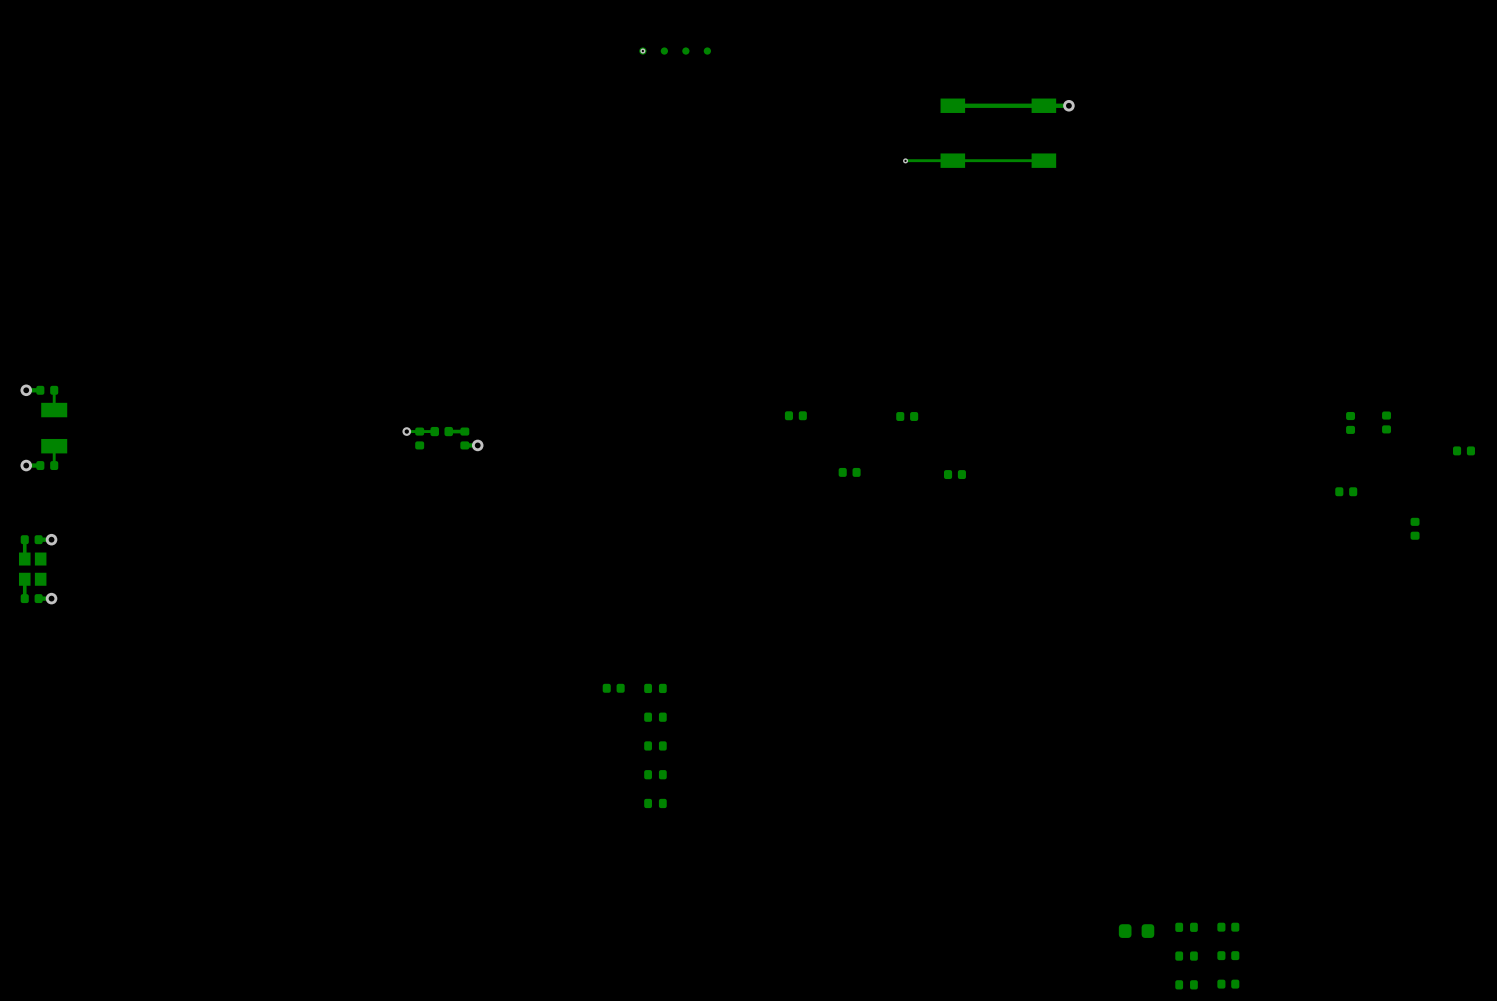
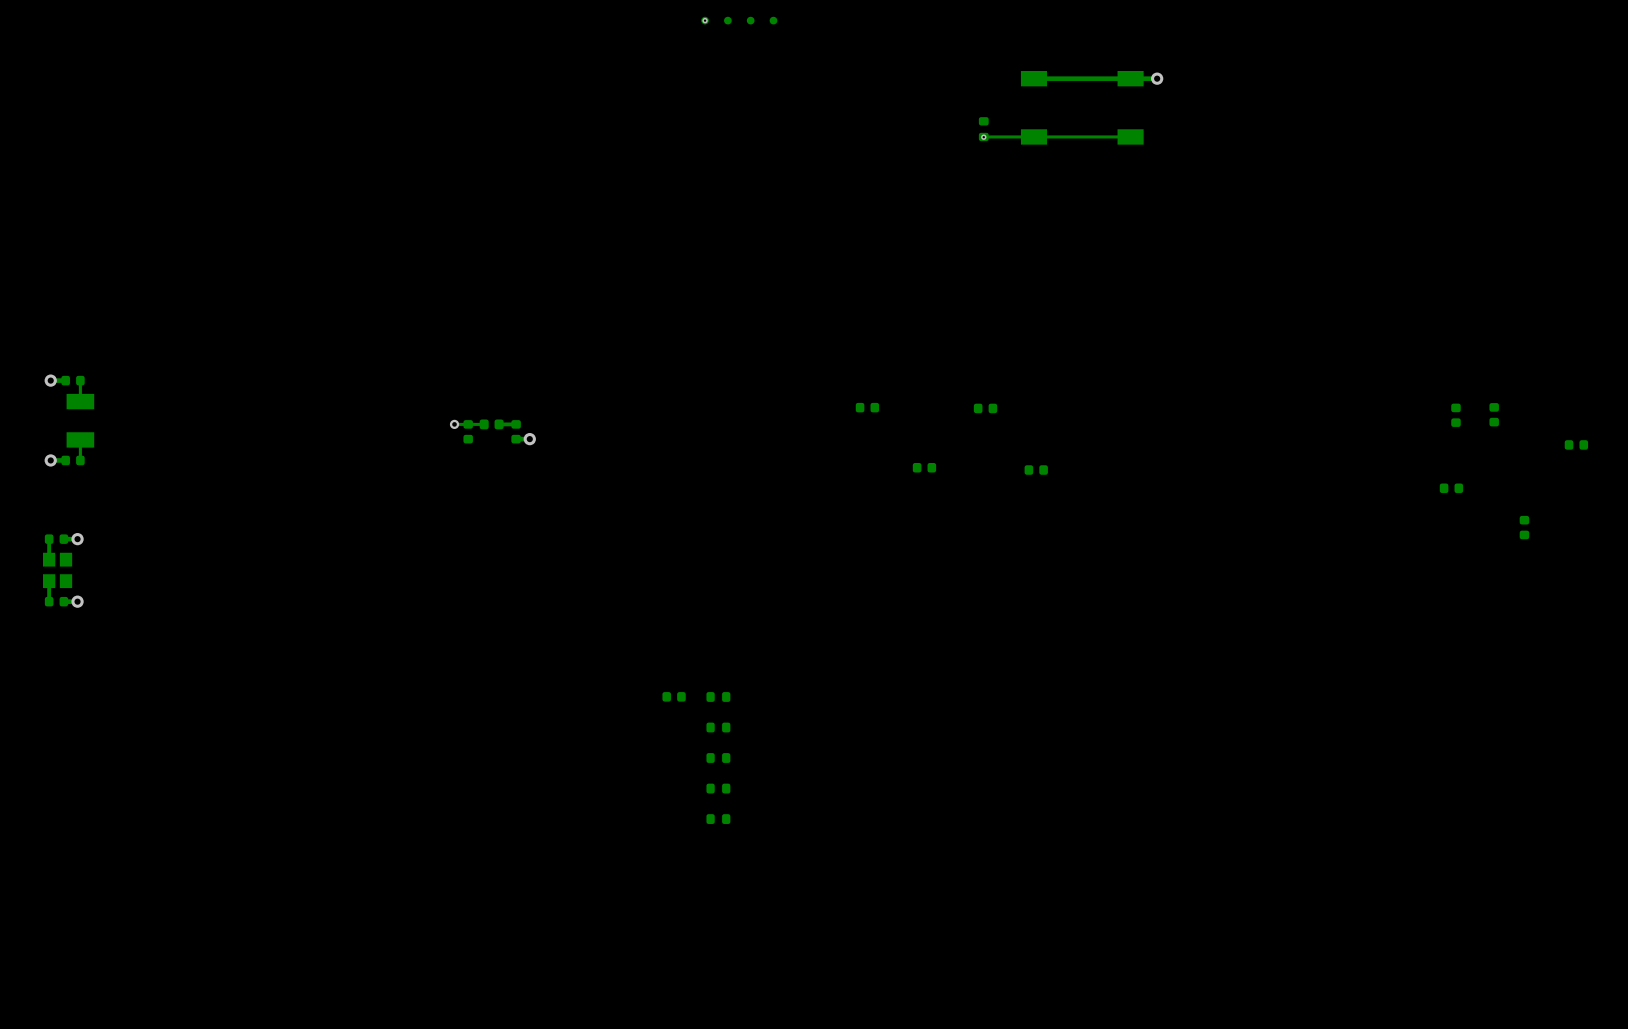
part: none -> (983, 129)
part: (1186, 927) -> none
part: (1228, 927) -> none
part: (1136, 931) -> none
part: (1228, 955) -> none
part: (1186, 956) -> none
part: (1186, 984) -> none
part: (1228, 984) -> none

